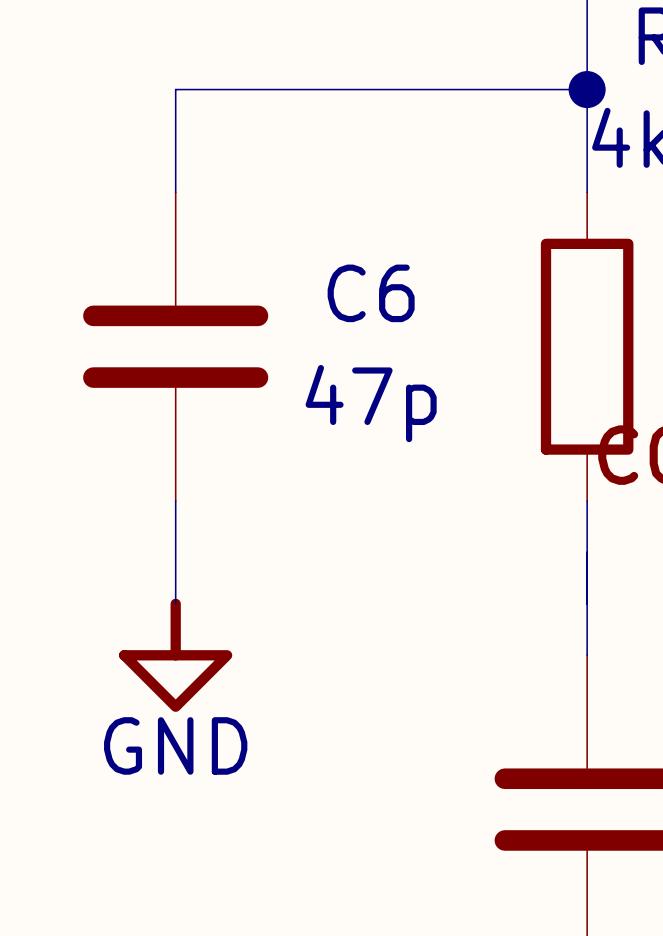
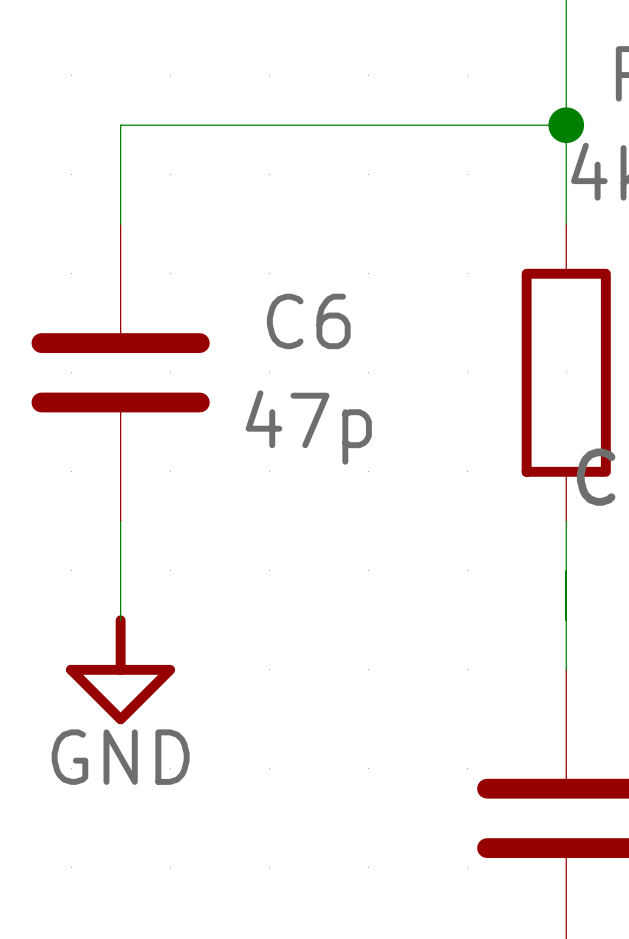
wire: (175, 89) (175, 192) -> (170, 125) (120, 125) (120, 224)
C6 position: (175, 346) -> (120, 372)
wire: (175, 501) (175, 603) -> (120, 521) (120, 620)
power symbol position: GND (175, 655) -> GND (120, 669)

